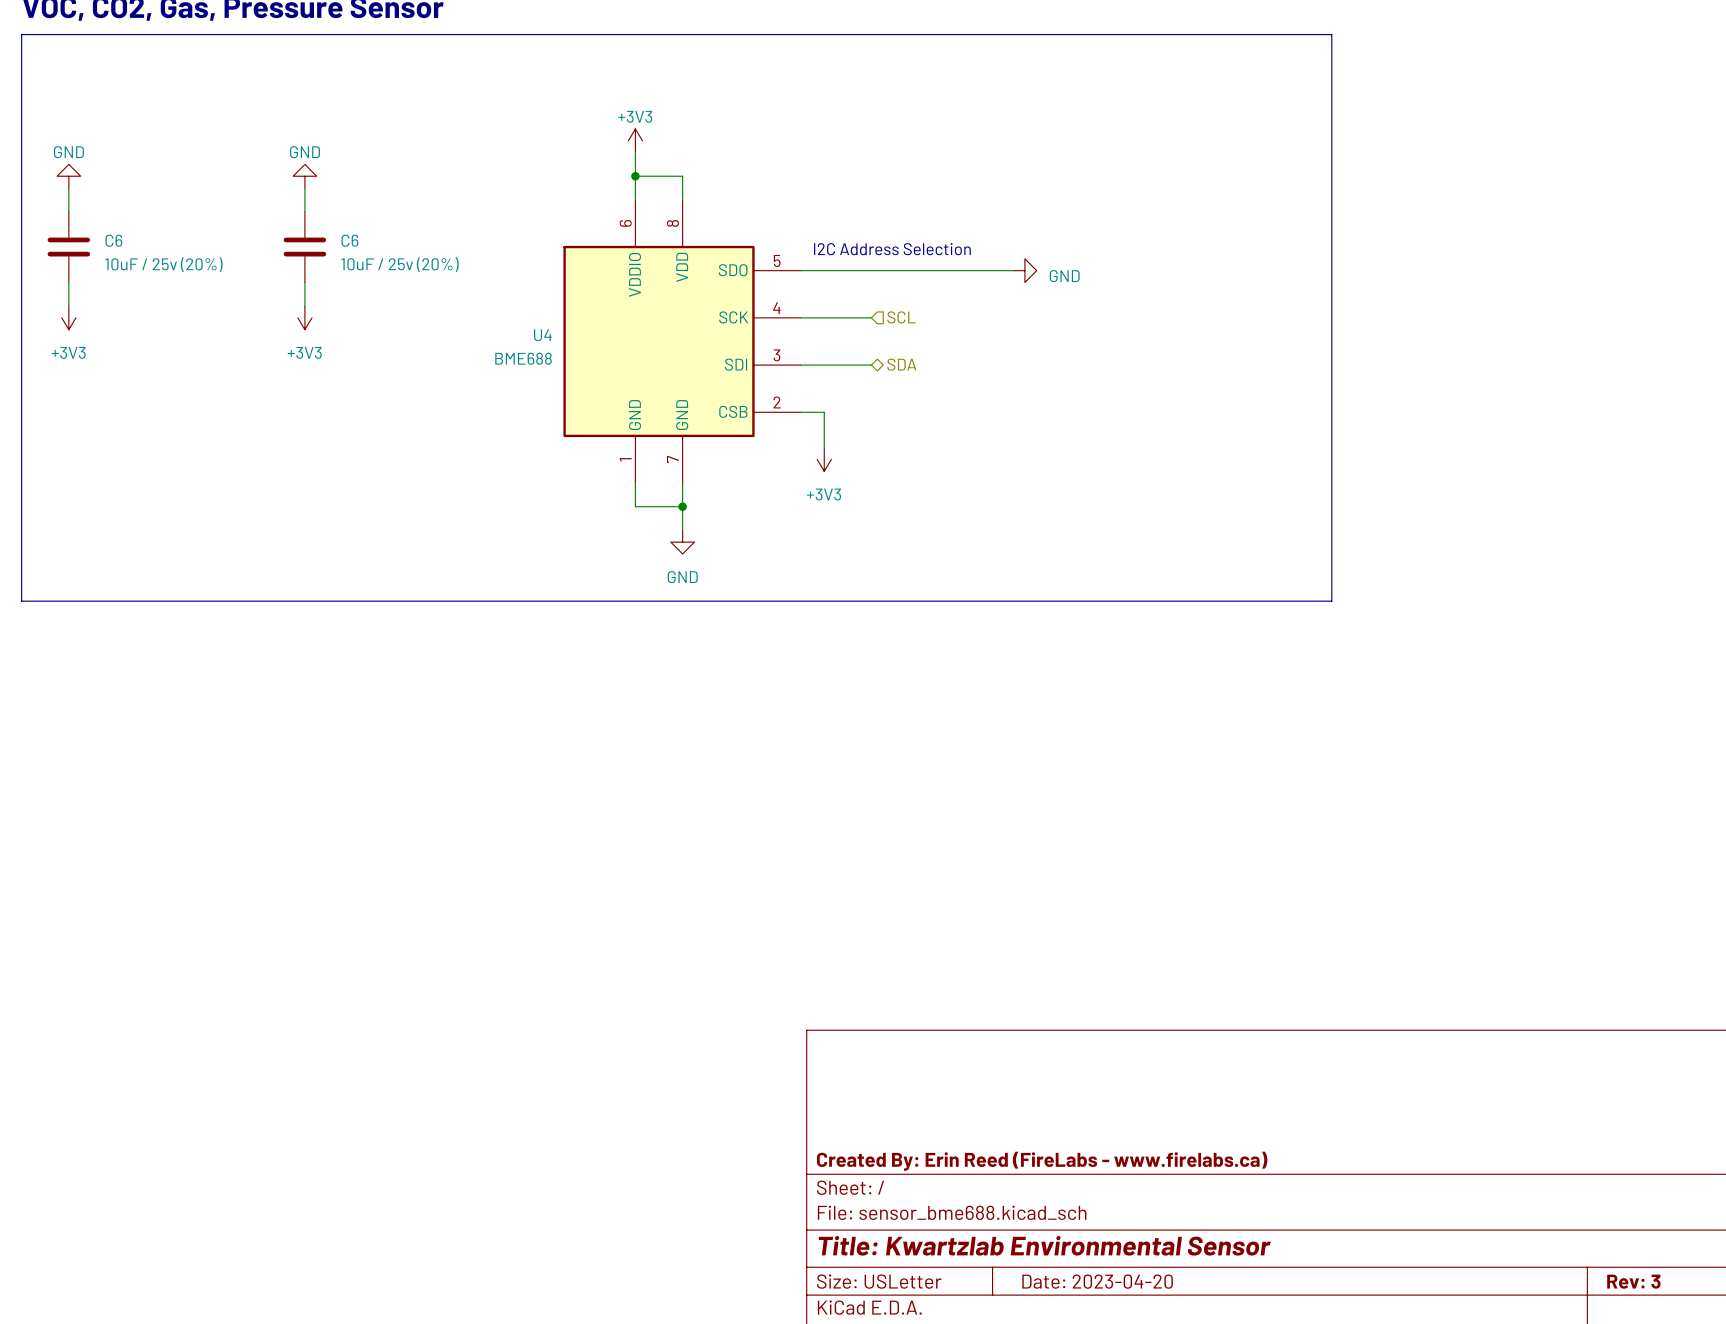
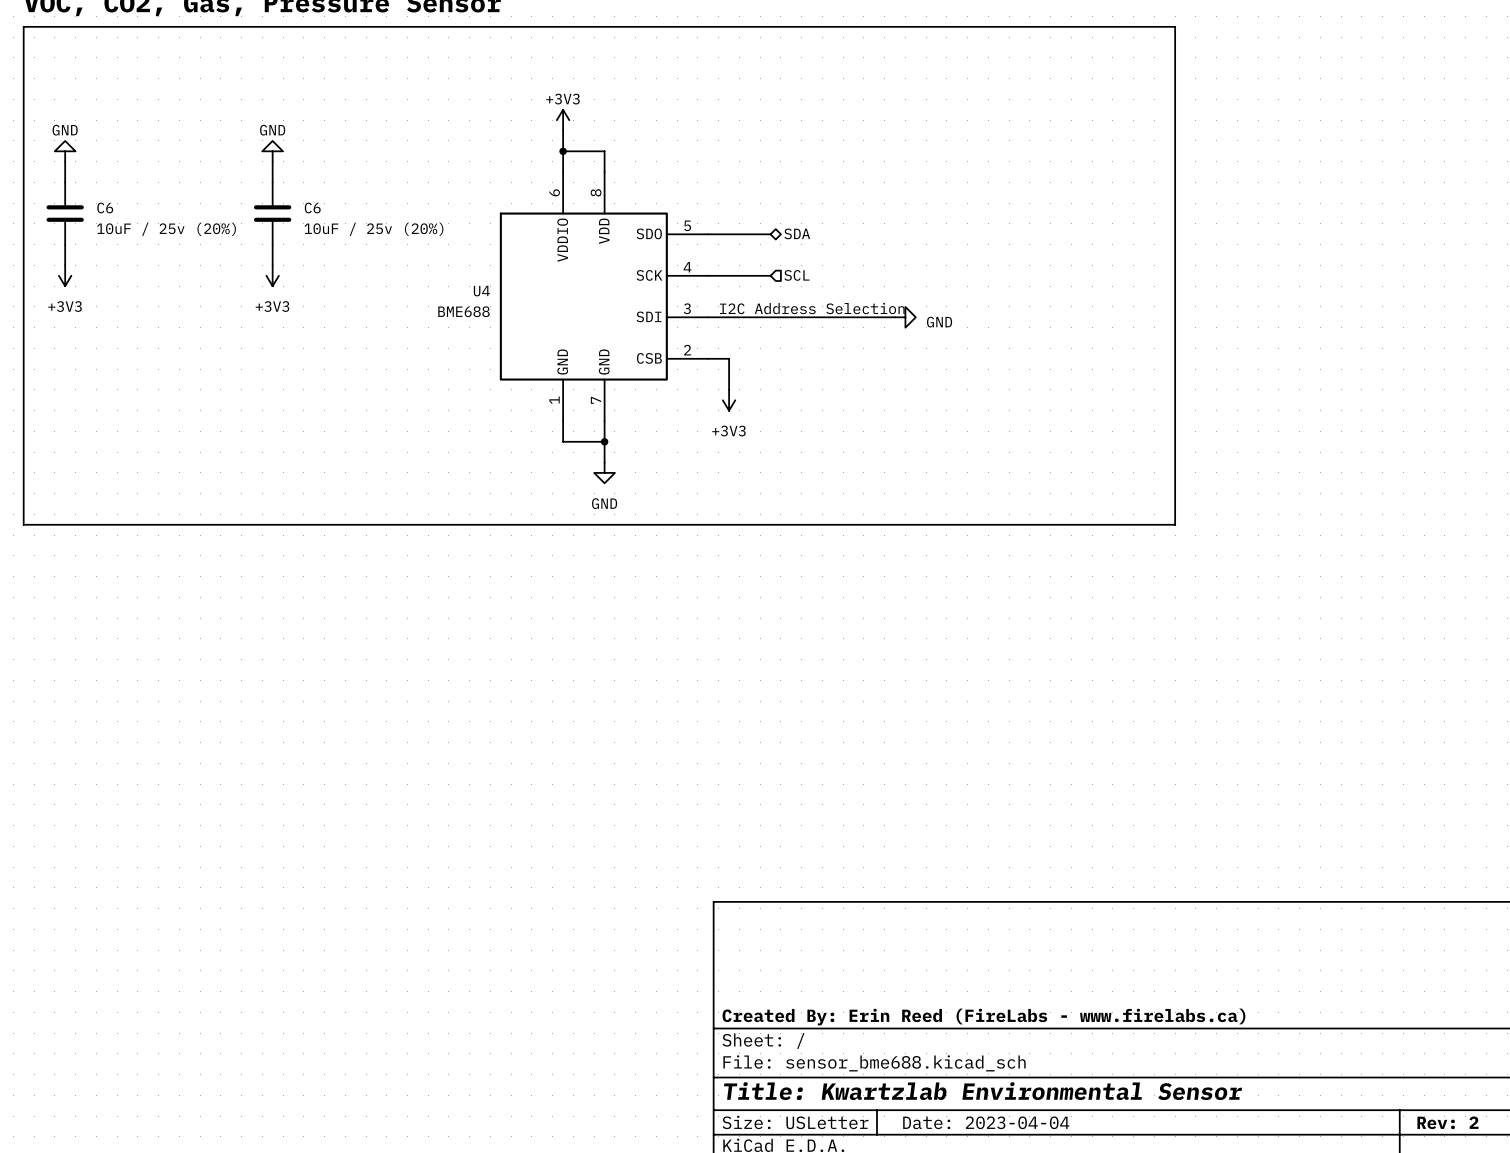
text position: I2C Address Selection (892, 249) -> I2C Address Selection (812, 308)
wire: (871, 270) (1013, 270) -> (770, 317) (895, 317)
power symbol position: GND (1024, 270) -> GND (905, 317)
hierarchical label position: SDA (901, 364) -> SDA (797, 233)
title block: Date: 2023-04-20 (1097, 1281) -> Date: 2023-04-04 (986, 1122)
title block: Rev: 3 (1633, 1281) -> Rev: 2 (1447, 1122)

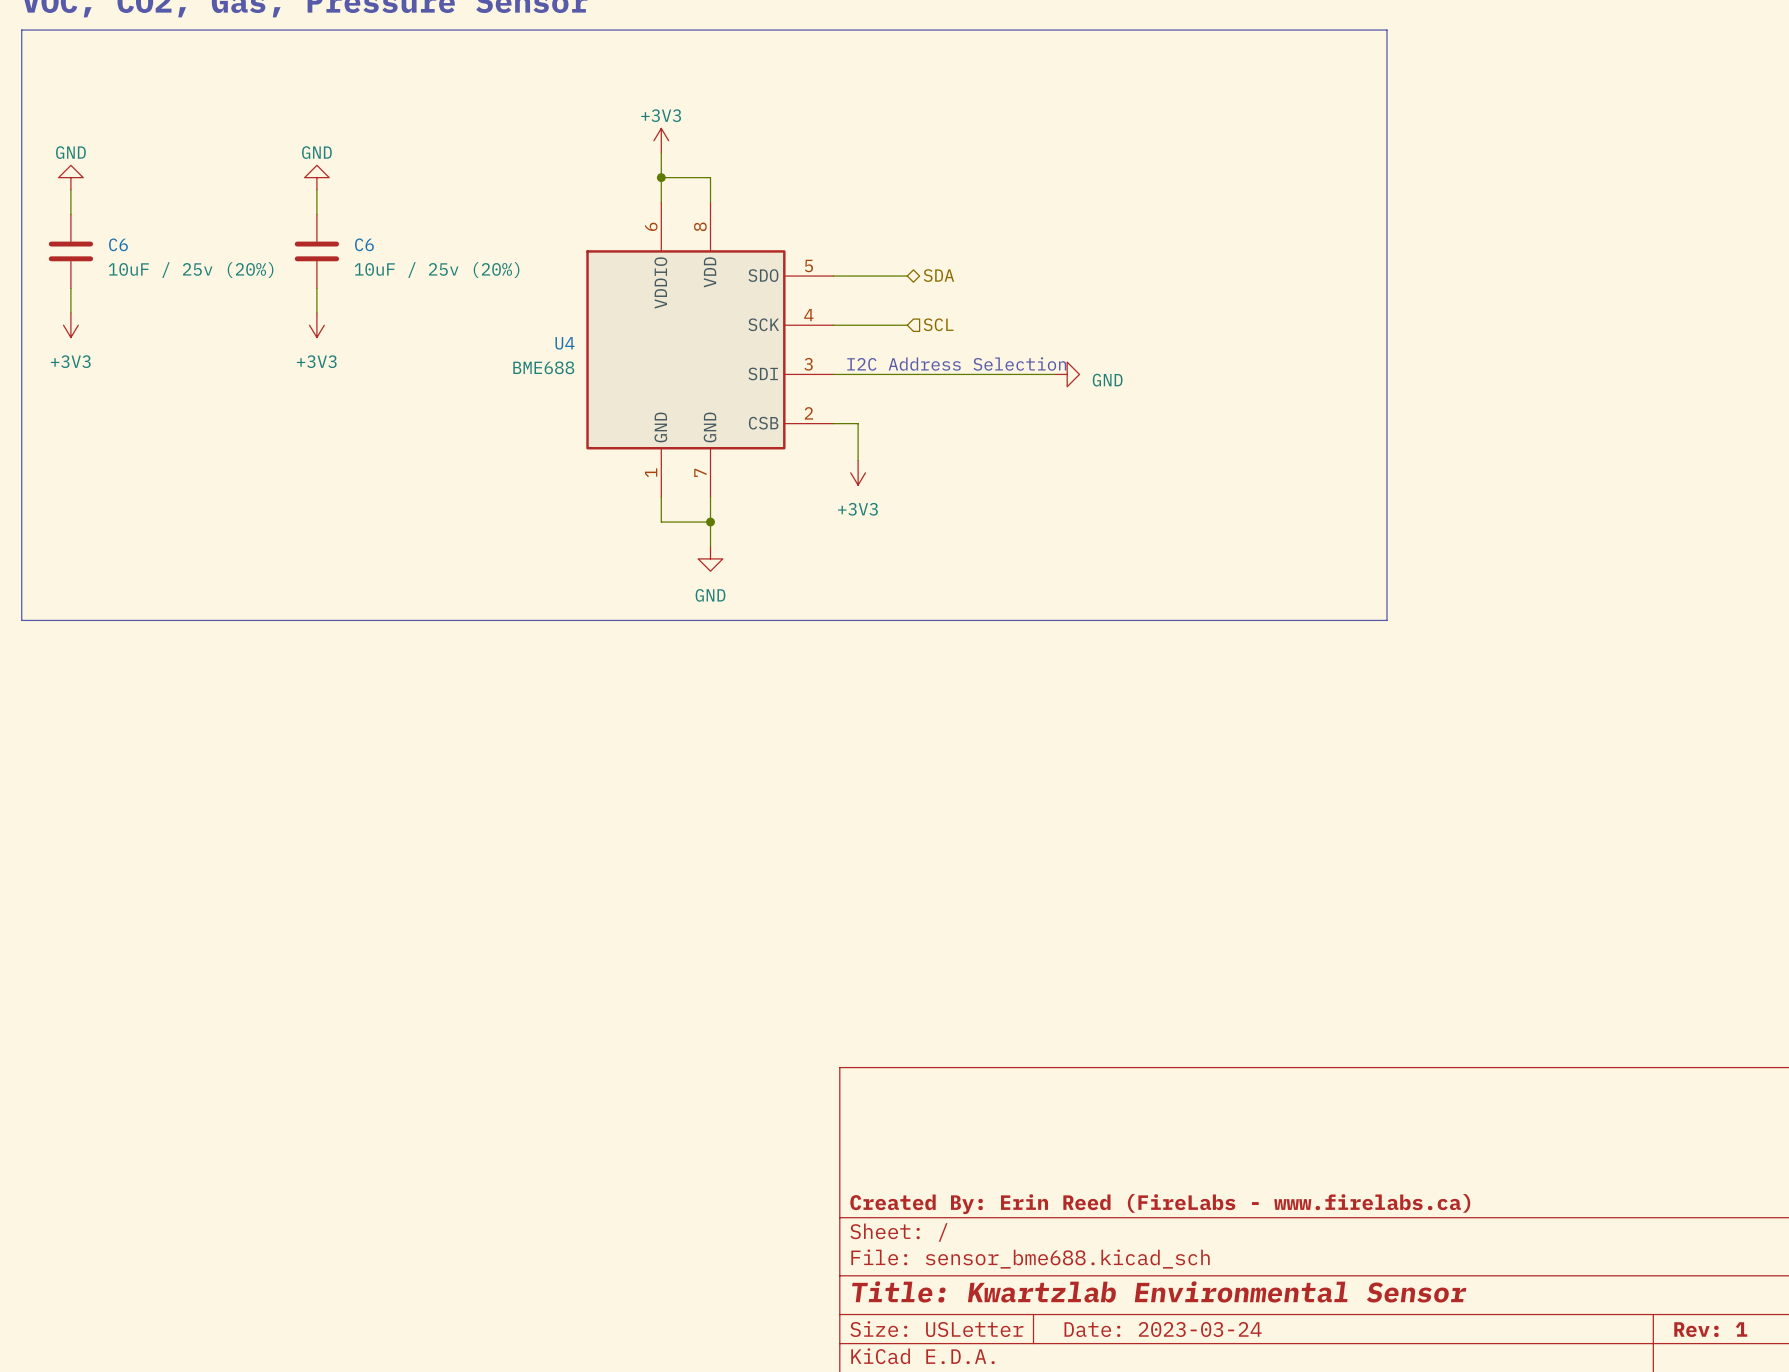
title block: Date: 2023-04-04 (986, 1122) -> Date: 2023-03-24 (1163, 1329)
title block: Rev: 2 (1447, 1122) -> Rev: 1 (1710, 1329)

